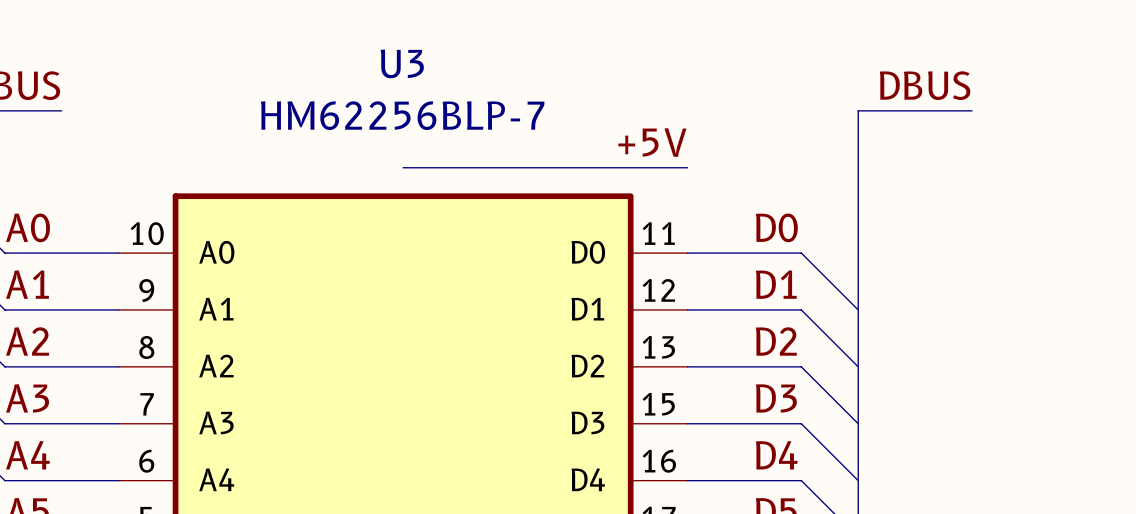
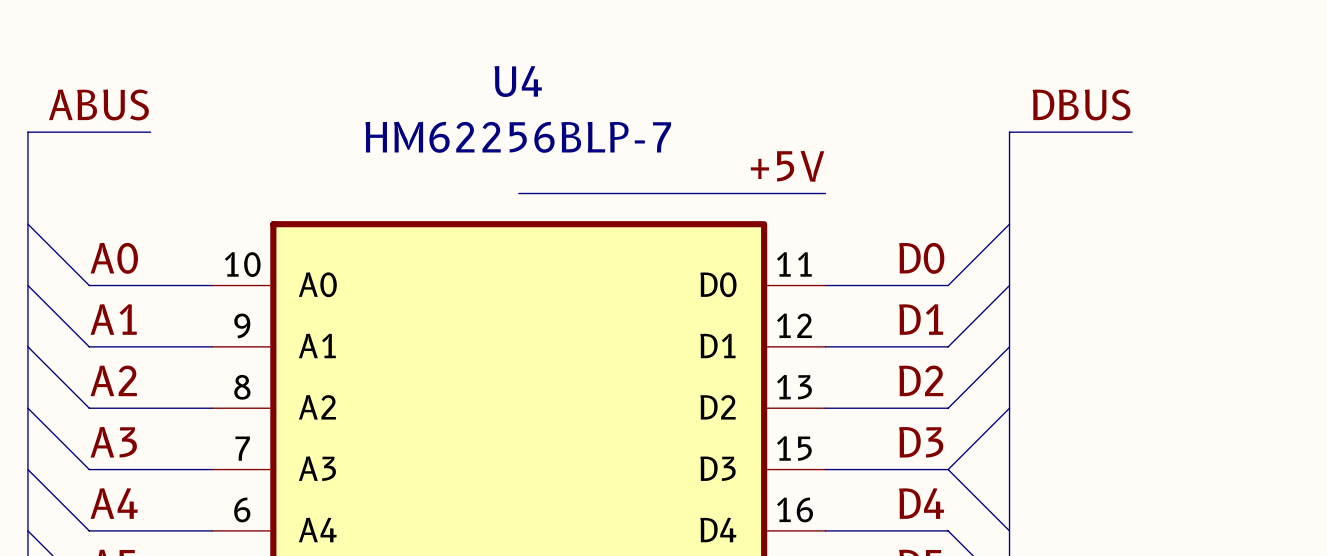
U3 name: U3 (402, 63) -> U4 (518, 81)
wire: (801, 253) (858, 309) -> (948, 285) (1009, 224)
wire: (801, 309) (858, 366) -> (948, 346) (1009, 285)
wire: (801, 366) (858, 423) -> (948, 408) (1009, 346)
wire: none -> (1009, 408) (948, 469)

